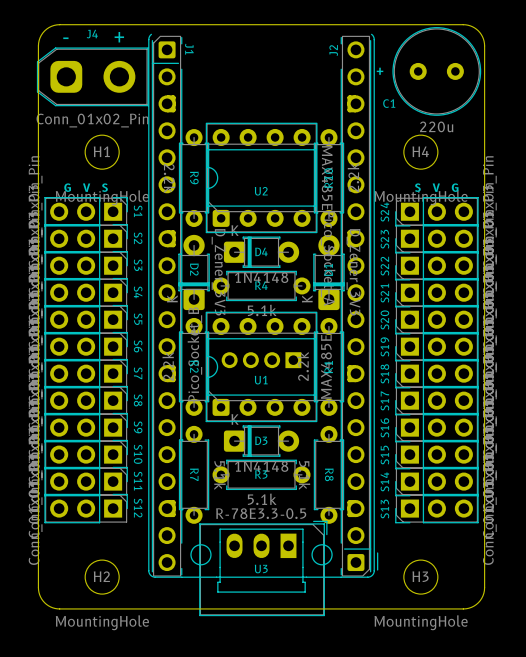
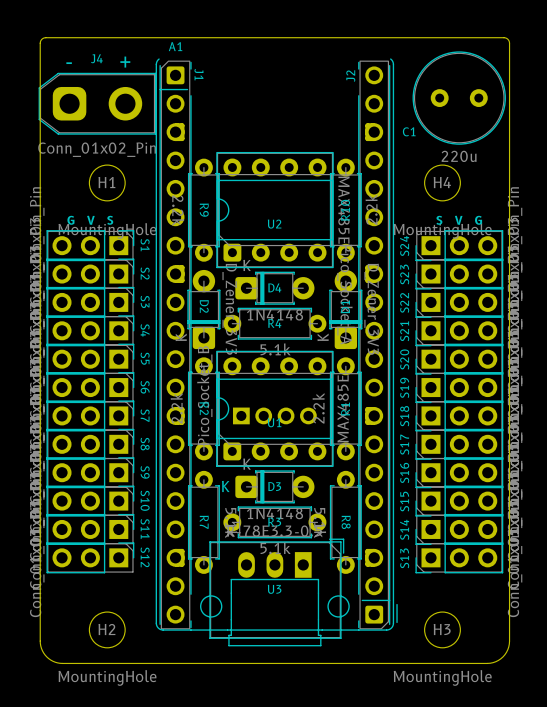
drawing: [148, 33, 379, 593] -> none
board edge: (38, 45) (40, 37) (44, 30) (51, 26) (59, 24) (463, 24) (472, 26) (478, 30) (482, 36) (484, 45) -> (40, 71) (40, 42) (45, 37) (504, 37) (509, 42) (509, 71)
text: + (380, 71) -> none
A1: none -> (276, 352)
part rotation: 0° (261, 360) -> 180° (274, 415)
D3 text: none -> K (225, 486)
U3 position: (263, 568) -> (276, 588)

